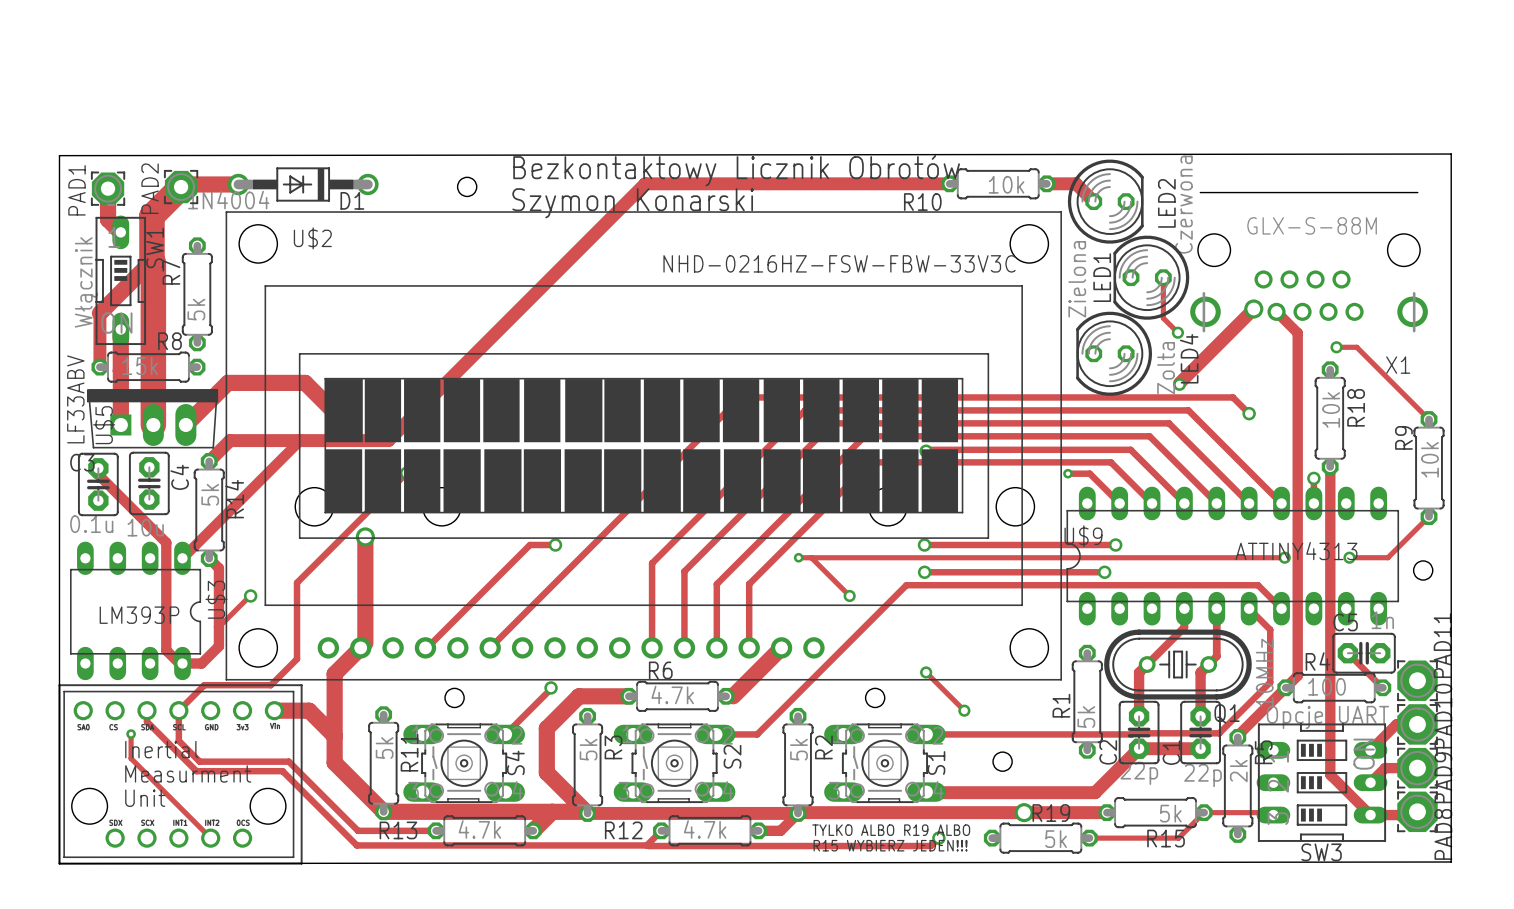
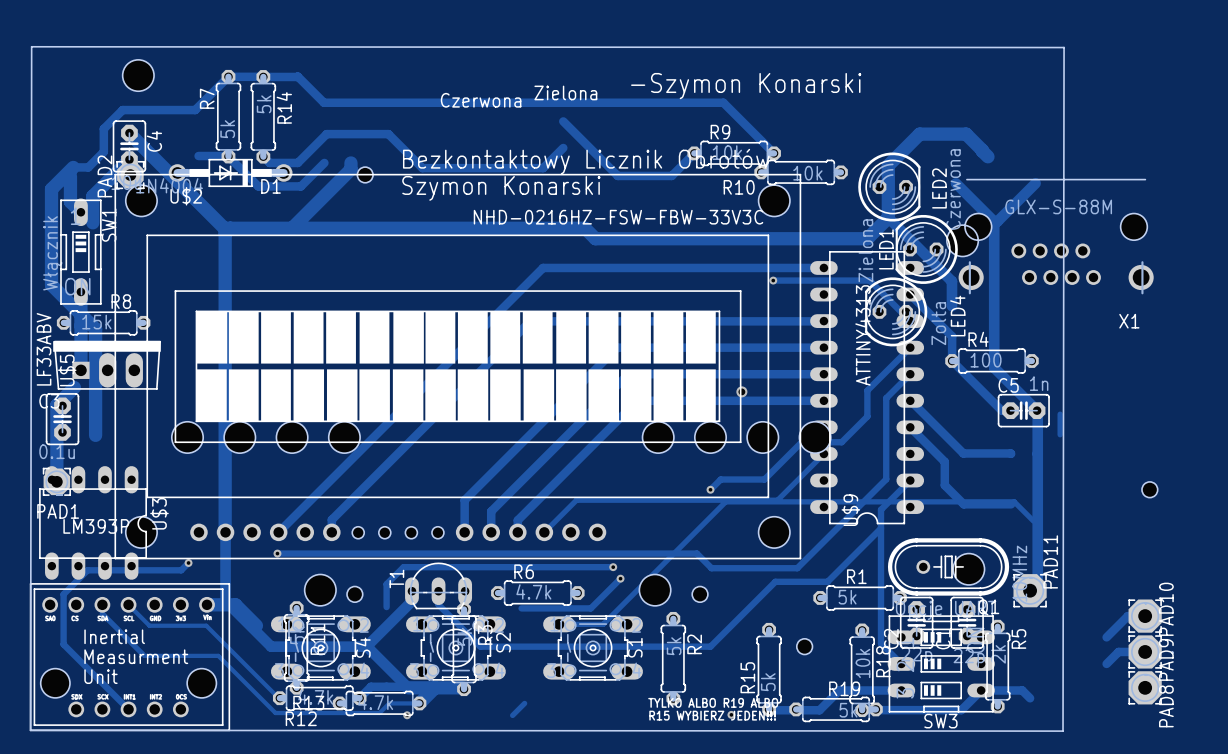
hole: none -> (138, 75)
track: none -> (263, 76) (228, 76) (195, 110) (122, 110) (103, 128) (103, 151) (88, 167) (73, 167) (51, 189) (51, 284) (95, 329) (95, 435)
track: none -> (263, 76) (297, 76) (323, 102) (723, 102) (774, 153)
text: none -> -Szymon Konarski (746, 86)
text: none -> Zielona (565, 92)
text: none -> Czerwona (481, 100)
track: none -> (563, 121) (617, 175) (671, 175) (694, 153)
track: none -> (129, 133) (224, 228) (584, 228) (595, 238) (867, 238) (888, 217)
track: none -> (563, 147) (543, 168) (422, 168) (388, 134) (326, 134) (297, 162) (269, 162) (263, 156)
board edge: (1451, 154) (1451, 862) (59, 863) (59, 155) (1451, 154) -> (31, 46) (30, 730) (1063, 731) (1064, 47) (31, 46)
track: none -> (198, 156) (227, 156) (258, 186) (300, 186) (324, 162)
track: none -> (987, 156) (966, 134) (919, 134) (888, 165) (888, 217)
track: none -> (129, 159) (92, 196) (92, 222)
track: none -> (350, 162) (350, 169) (292, 228)
track: (949, 183) (645, 183) (388, 440) (230, 440) (209, 461) -> none
track: (1046, 183) (1075, 183) (1093, 201) -> none
track: (238, 184) (183, 184) (151, 216) (151, 261) -> none
PAD1 position: (108, 188) -> (56, 481)
PAD1 name rotation: 0° (77, 190) -> 90° clockwise (58, 511)
track: none -> (955, 183) (994, 221)
track: none -> (1035, 183) (997, 221) (994, 221)
U$2 footprint: [225, 211, 1062, 681] -> [114, 173, 802, 560]
track: none -> (888, 217) (951, 281) (951, 306)
track: none -> (994, 221) (994, 367) (1037, 411) (1037, 583) (1030, 590)
track: (151, 261) (99, 313) (99, 367) -> none
track: (151, 261) (153, 424) -> none
hole: none -> (962, 240)
track: (1163, 277) (1163, 318) (1177, 332) -> none
R7 position: (197, 294) -> (228, 116)
track: none -> (823, 267) (543, 267) (278, 532)
track: (1253, 309) (1179, 384) -> none
via: (1253, 309) -> none
track: (1276, 311) (1297, 333) (1297, 675) (1237, 737) -> none
track: none -> (773, 280) (869, 280) (910, 321)
via: none -> (773, 280)
track: none -> (910, 294) (952, 336) (952, 360) (1001, 410) (1010, 410)
via: (1177, 332) -> none
track: (1336, 347) (1356, 347) (1429, 419) -> none
via: (1336, 347) -> none
track: none -> (823, 321) (530, 321) (331, 519) (331, 532)
via: (1179, 384) -> none
track: none -> (823, 347) (617, 347) (464, 500) (464, 532)
track: none -> (910, 347) (867, 390) (867, 416) (841, 442) (801, 442) (764, 479) (720, 479) (710, 489)
track: (1249, 413) (1232, 397) (740, 397) (490, 647) -> none
via: (1249, 413) -> none
track: (339, 417) (305, 382) (227, 382) (185, 424) -> none
R18 position: (1330, 418) -> (862, 670)
track: none -> (823, 374) (628, 374) (491, 511) (491, 532)
track: none -> (910, 374) (886, 398) (886, 479) (797, 568) (711, 568) (696, 553) (277, 553)
track: (300, 440) (182, 558) -> none
track: none -> (74, 387) (56, 405) (56, 481)
track: (926, 451) (1130, 449) (1184, 503) -> none
track: none -> (823, 400) (637, 400) (517, 520) (517, 532)
track: none -> (910, 400) (963, 453) (1011, 453)
track: (1330, 466) (1330, 774) (1370, 815) (1414, 815) (1417, 811) -> none
track: (98, 468) (98, 474) (166, 542) (166, 650) (179, 663) (201, 663) (218, 646) (218, 568) (209, 558) -> none
R9 rotation: 0° (1429, 468) -> 90° clockwise (734, 153)
R9 position: (1429, 468) -> (734, 153)
track: (406, 473) (297, 582) (297, 622) -> (230, 228) (225, 233) (225, 532)
track: (1067, 473) (1089, 473) (1119, 503) -> none
via: (1067, 473) -> none
via: (1313, 478) -> none
C4 position: (149, 483) -> (129, 146)
track: none -> (910, 427) (944, 461) (944, 485) (963, 504) (1011, 504)
track: (1152, 503) (1110, 462) (870, 462) (749, 584) (749, 647) -> none
track: (1216, 503) (1149, 436) (864, 436) (716, 584) (716, 647) -> none
track: (1249, 503) (1169, 423) (832, 423) (684, 571) (684, 647) -> none
track: (1281, 503) (1188, 410) (805, 410) (652, 563) (652, 647) -> none
hole: none -> (187, 437)
hole: none -> (292, 437)
hole: none -> (658, 437)
hole: none -> (762, 437)
R14 position: (209, 510) -> (263, 116)
track: (1429, 516) (1387, 557) (1349, 557) -> none
track: none -> (823, 453) (777, 500) (576, 500) (544, 532)
track: (365, 536) (365, 643) (334, 673) (334, 762) (383, 811) (519, 811) -> (367, 646) (408, 687)
via: (365, 536) -> none
track: (555, 545) (529, 545) (425, 647) -> none
via: (555, 545) -> none
track: (924, 545) (1115, 545) -> none
via: (924, 545) -> none
via: (1115, 545) -> none
U$9 rotation: 0° (1232, 556) -> 90° counterclockwise (867, 387)
track: (798, 557) (1284, 557) -> none
via: (798, 557) -> none
track: (811, 557) (849, 595) -> none
via: (1284, 557) -> none
via: (1349, 557) -> none
track: none -> (910, 480) (881, 509) (881, 643) (901, 663)
via: none -> (710, 489)
track: (924, 572) (1104, 572) -> none
via: (924, 572) -> none
via: (1104, 572) -> none
track width: thin (297, 582) (297, 659) -> thick (225, 499) (225, 562)
track: (250, 595) (218, 627) -> none
via: (250, 595) -> none
via: (849, 595) -> none
track: (1184, 608) (1184, 627) (1139, 672) (1139, 716) -> none
track: (1216, 608) (1216, 656) (1200, 672) (1200, 716) -> none
track: (1249, 608) (1270, 629) (1270, 682) (1219, 733) (926, 734) -> none
track: none -> (881, 528) (827, 581) (775, 581) (710, 646) (480, 646) (438, 604) (438, 591)
via: none -> (277, 553)
track: (781, 651) (781, 647) (733, 696) (726, 696) -> none
track: (1347, 653) (1382, 687) -> none
C5 position: (1364, 653) -> (1023, 410)
track: none -> (188, 562) (181, 570) (87, 570) (63, 594) (63, 644) (128, 709)
via: none -> (188, 562)
track: (297, 659) (270, 685) (204, 685) (178, 710) (178, 740) (199, 761) (288, 761) (358, 830) (436, 830) -> (225, 562) (225, 601) (271, 646) (367, 646)
track: none -> (613, 567) (403, 567) (386, 584) (386, 607)
via: none -> (613, 567)
hole: none -> (968, 569)
track: (926, 672) (964, 710) -> none
via: (926, 672) -> none
track: none -> (620, 578) (590, 608) (521, 608)
via: none -> (620, 578)
PAD11 position: (1417, 680) -> (1030, 590)
track: (551, 687) (505, 734) -> none
via: (551, 687) -> none
T1: none -> (438, 585)
R4 position: (1334, 687) -> (991, 360)
hole: none -> (320, 590)
hole: none -> (655, 590)
track: none -> (411, 591) (411, 601) (367, 646)
track: (628, 696) (578, 696) (546, 728) (546, 772) (587, 813) (798, 813) -> none
R1 rotation: 0° (1087, 701) -> 90° clockwise (860, 597)
track: none -> (128, 604) (149, 625) (206, 625) (279, 698)
via: (964, 710) -> none
track: (131, 734) (131, 758) (210, 838) -> none
via: (131, 734) -> none
track: (1200, 748) (1139, 748) (1095, 792) (926, 792) -> none
S4 position: (464, 763) -> (320, 647)
S2 position: (674, 763) -> (455, 647)
S1 position: (884, 763) -> (593, 647)
R2 position: (798, 764) -> (673, 658)
track: (196, 771) (282, 771) (356, 845) (930, 846) (938, 838) -> (143, 654) (218, 655) (275, 713) (379, 713) (389, 703) (415, 703)
SW3 position: (1321, 782) -> (941, 663)
track: none -> (407, 686) (371, 686) (359, 698)
via: (1024, 812) -> none
track: (1106, 812) (798, 813) -> none
R15 rotation: 0° (1155, 812) -> 90° clockwise (769, 669)
R15 position: (1155, 812) -> (769, 669)
track: (798, 813) (780, 830) (758, 830) -> none
track: none -> (901, 690) (839, 690) (819, 710) (769, 709)
track: (1273, 815) (1271, 812) (1204, 812) (1178, 838) (1089, 838) -> none
track: none -> (1030, 698) (1022, 690) (981, 690) (961, 710) (862, 710)
R12 name position: R12 (623, 830) -> R12 (301, 718)
R12 position: (709, 830) -> (319, 698)
via: (938, 838) -> none
via: none -> (731, 714)
via: none -> (407, 715)

